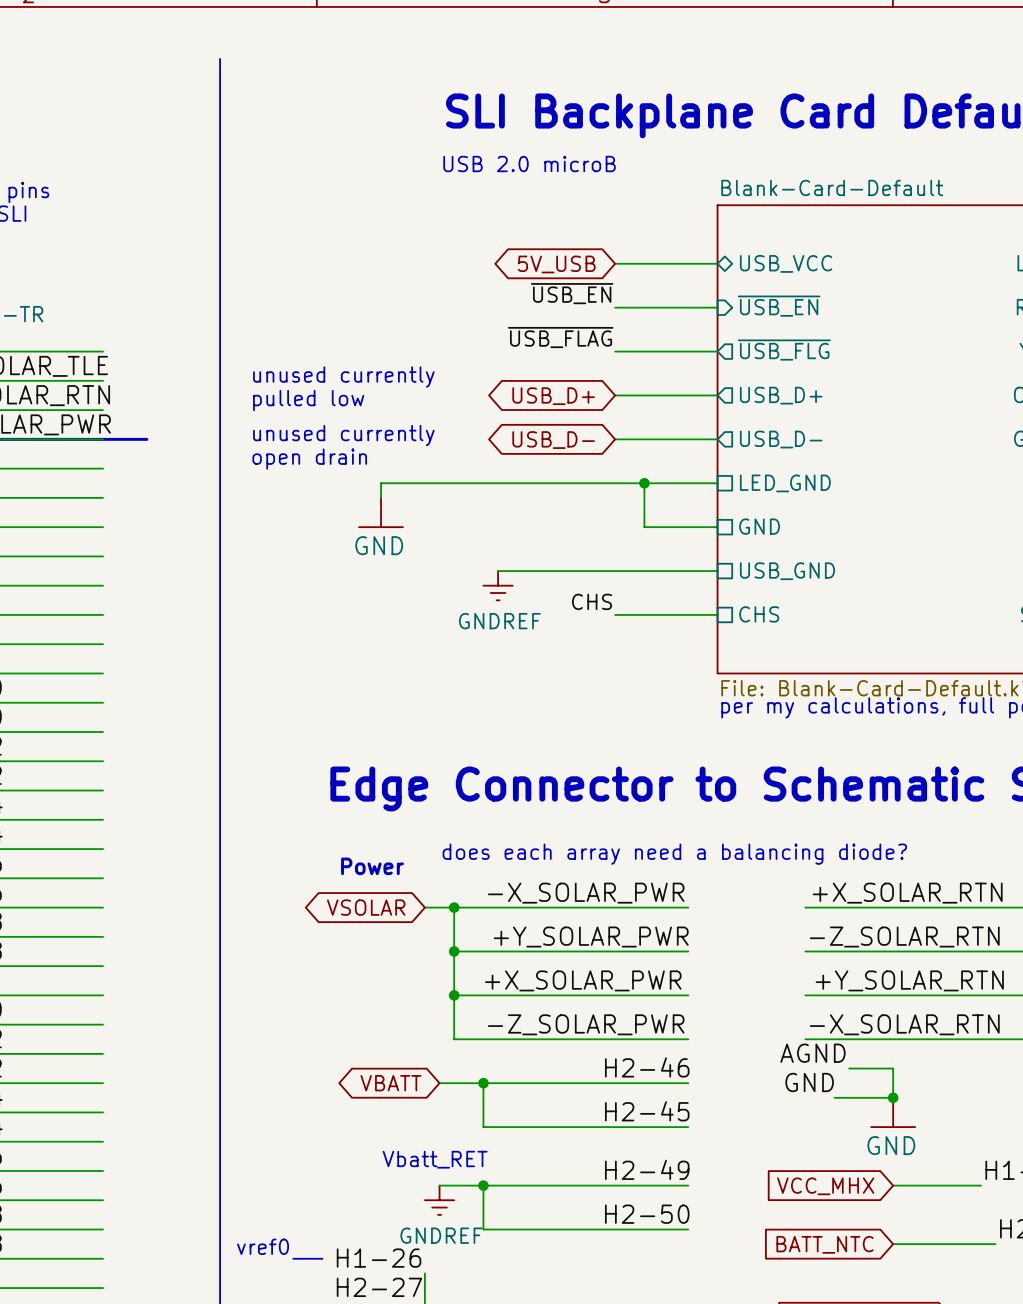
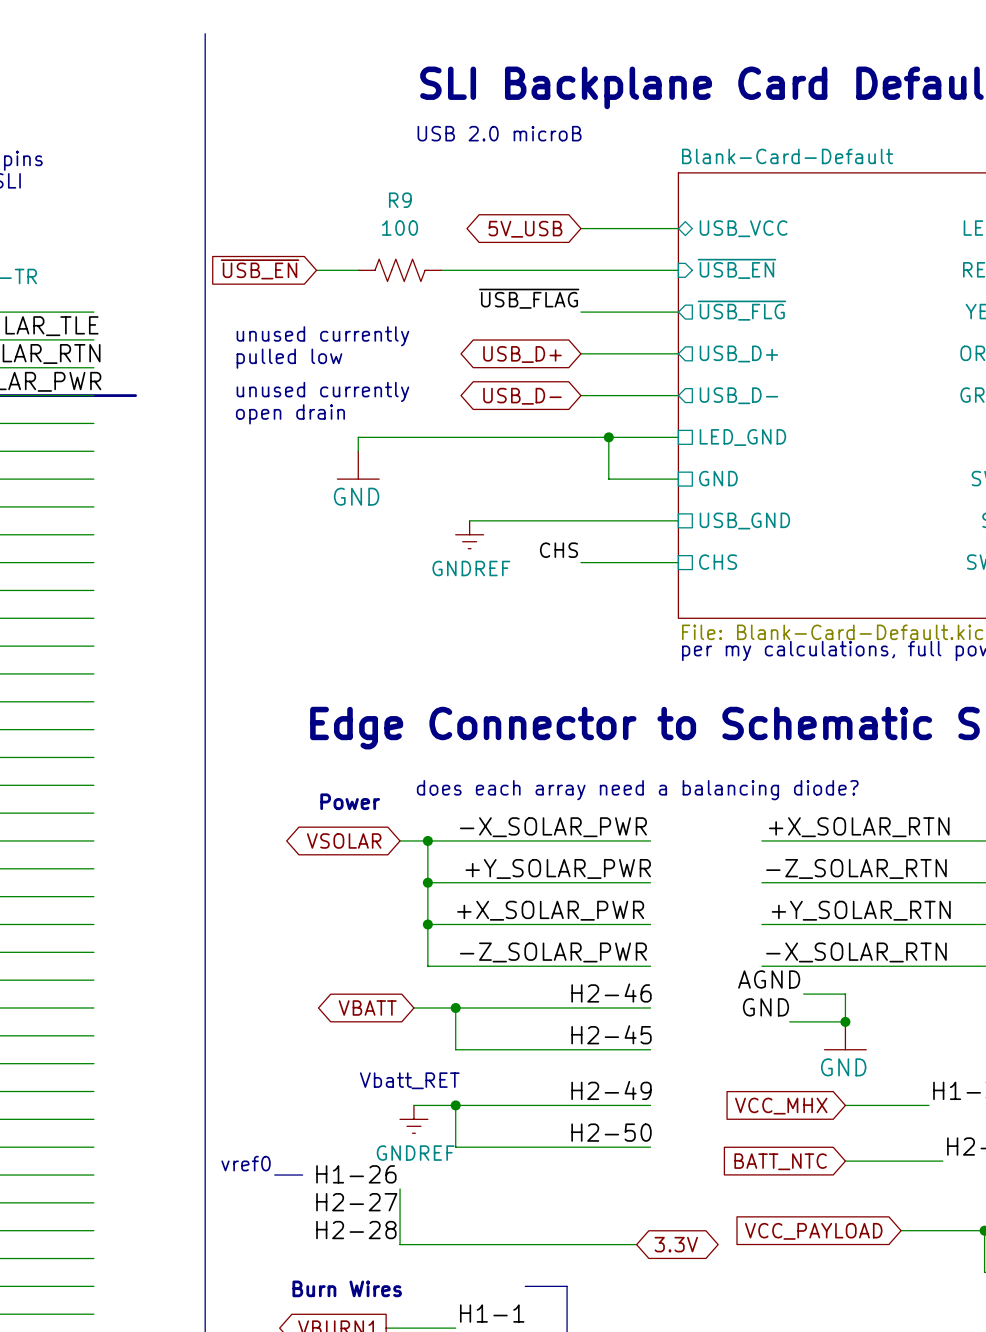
label: ~{USB_EN} (572, 293) -> none
global label: none -> ~{USB_EN} (260, 269)
wire: none -> (316, 270) (358, 270)
R9: none -> 100 (400, 270)
wire: none -> (441, 270) (580, 270)

